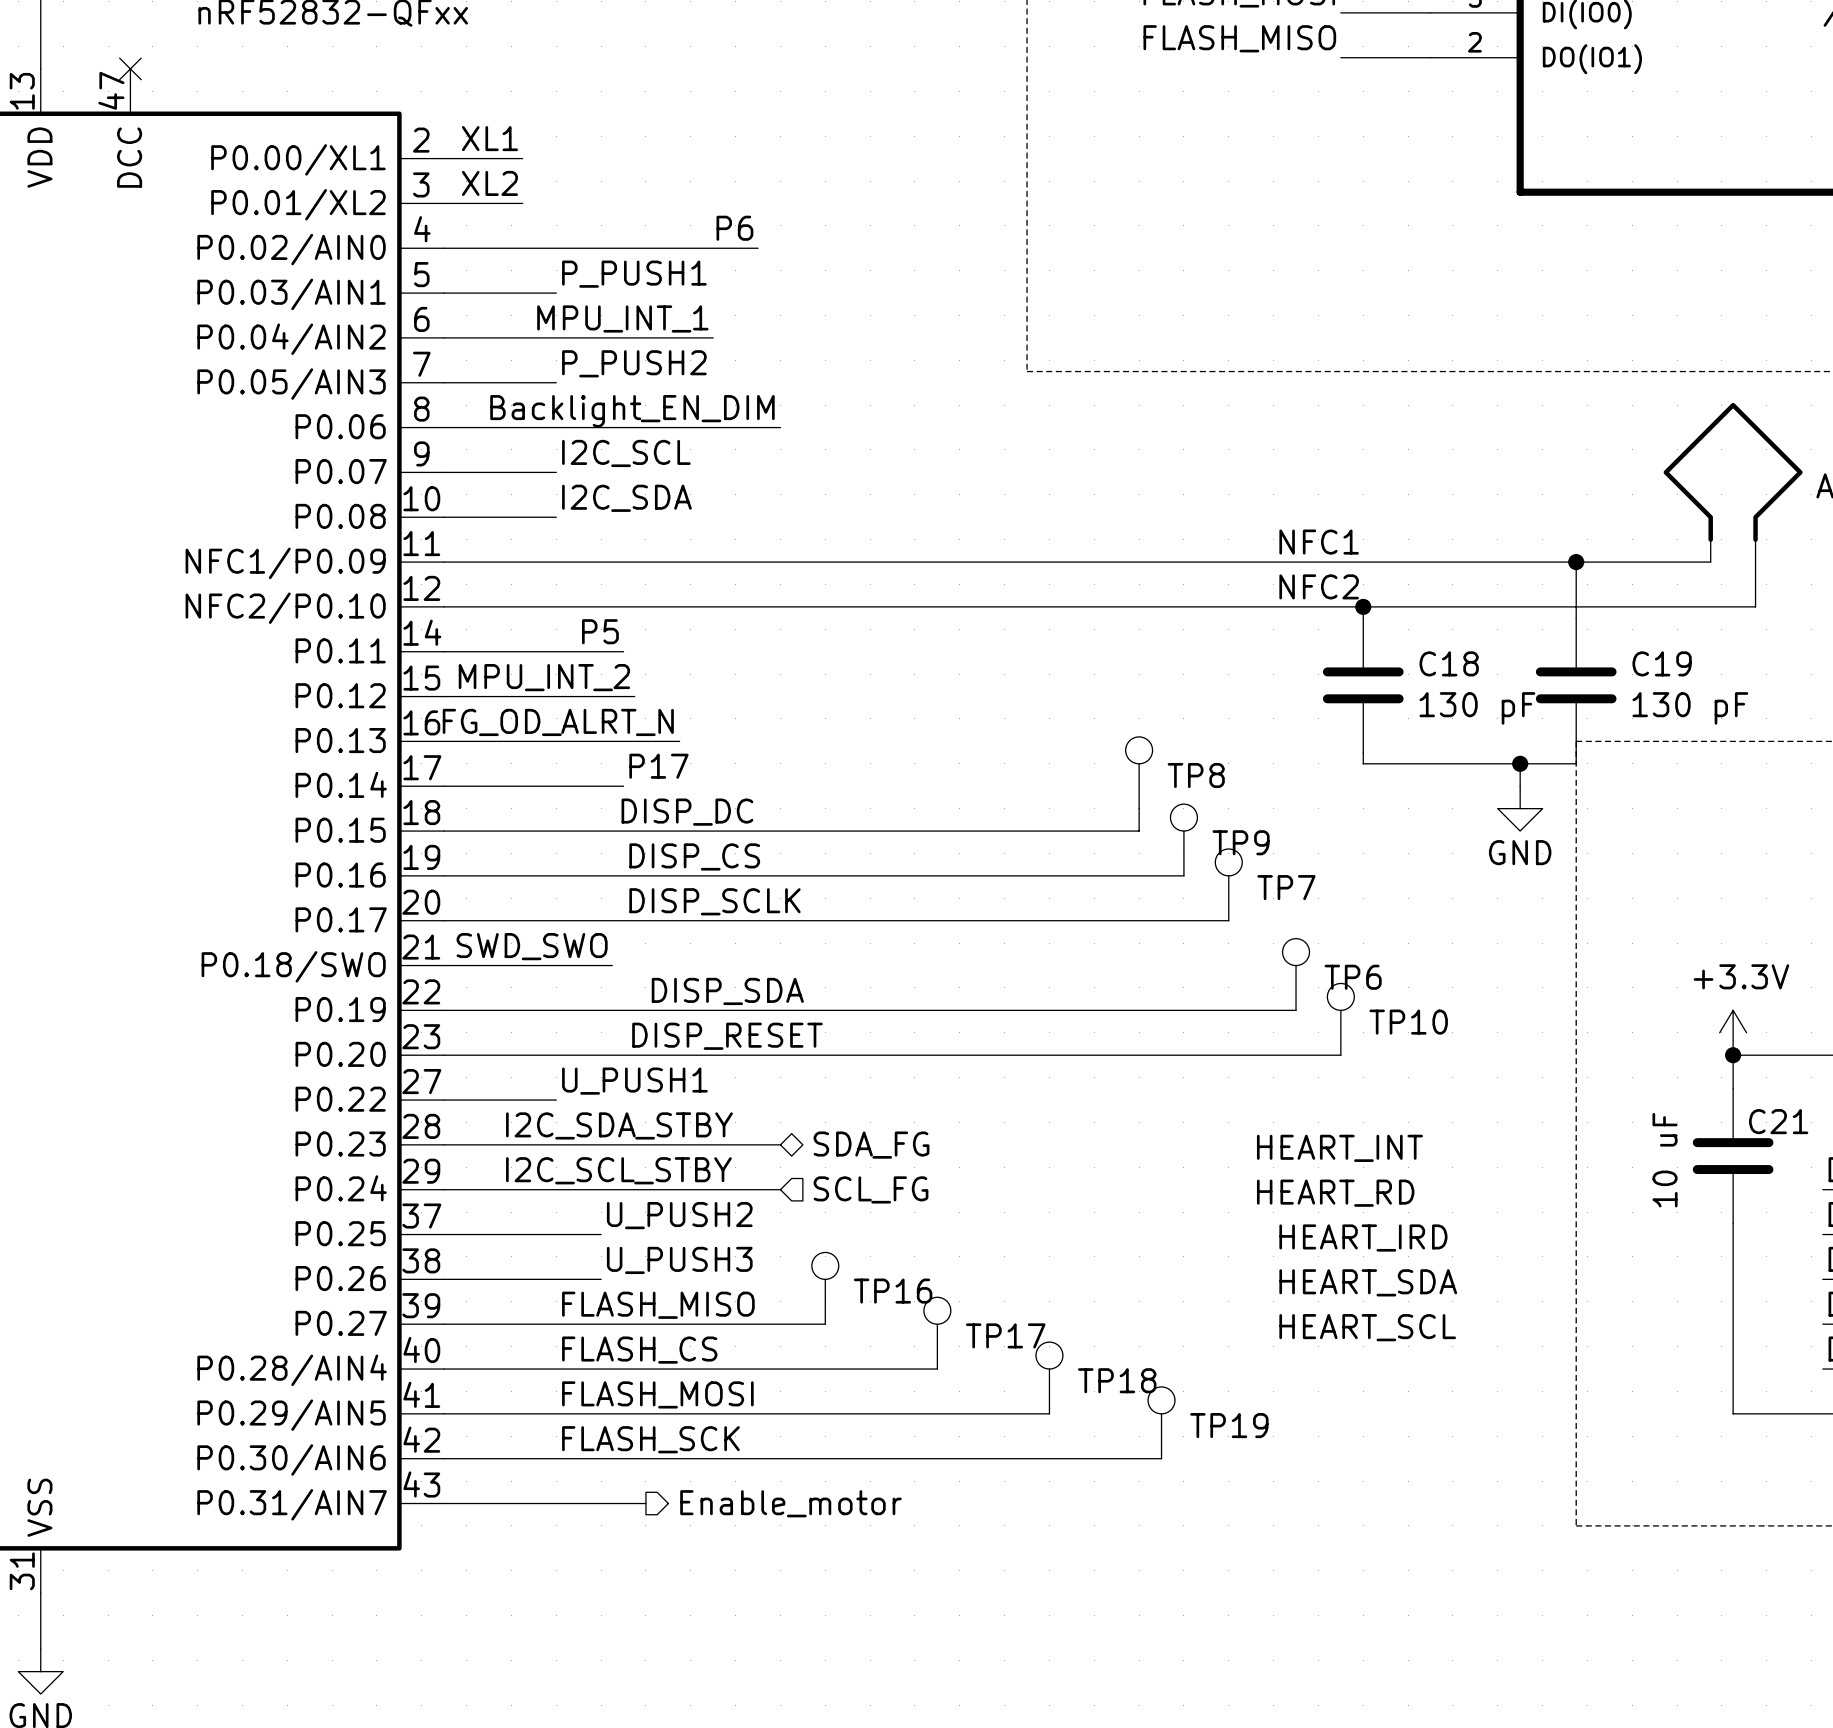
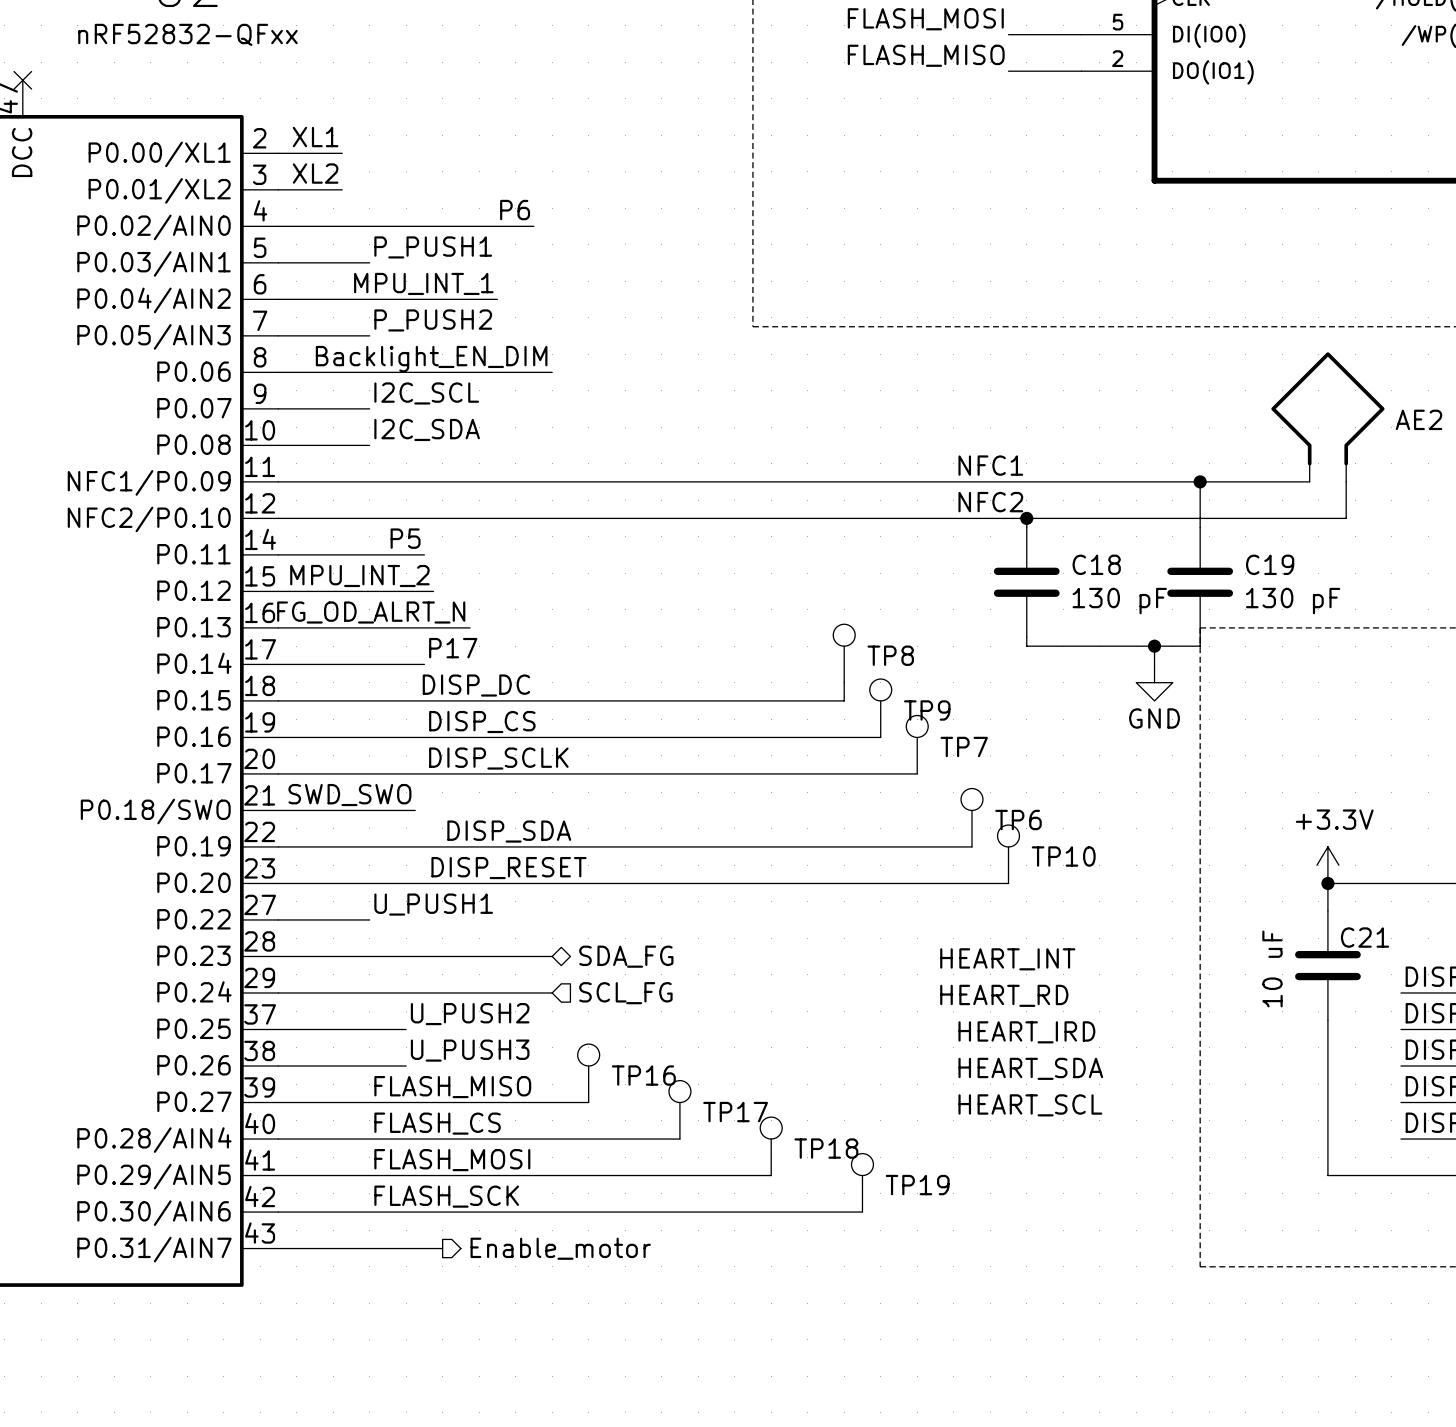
label: I2C_SDA_STBY (619, 1125) -> none
label: I2C_SCL_STBY (618, 1170) -> none

